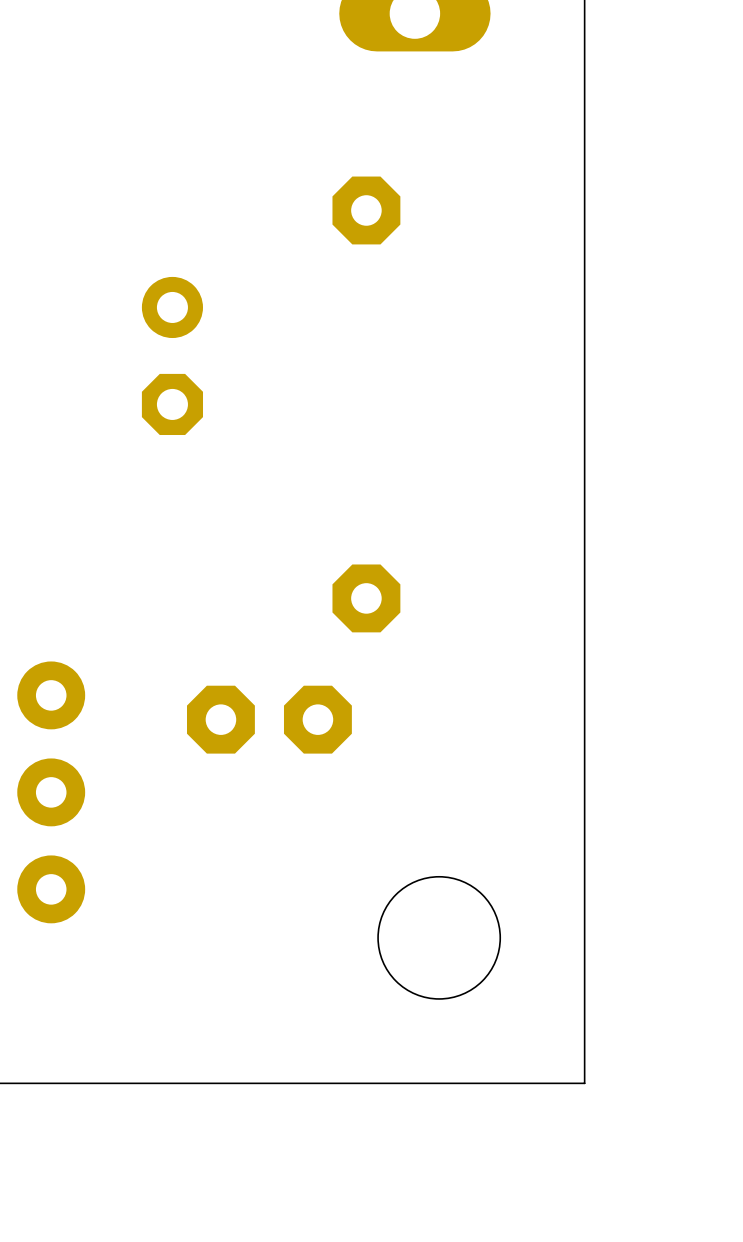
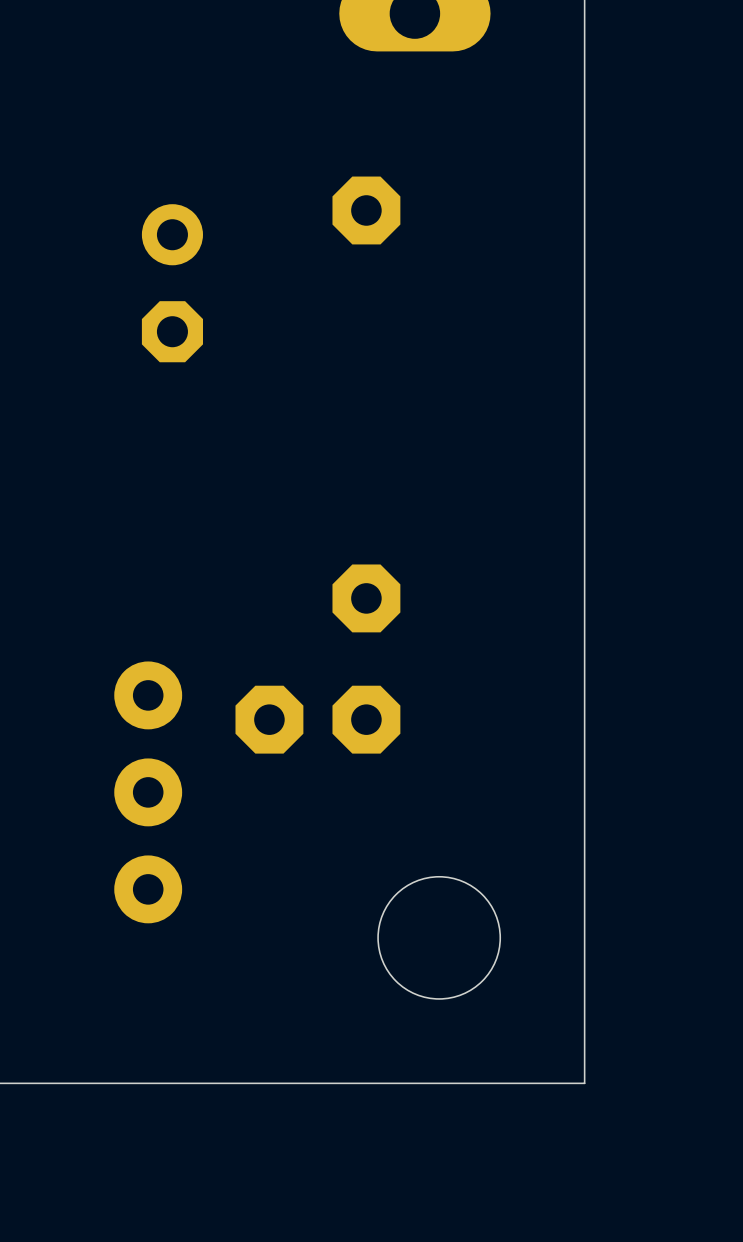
part position: (172, 355) -> (172, 283)
part position: (269, 719) -> (317, 719)
part position: (51, 792) -> (148, 792)

